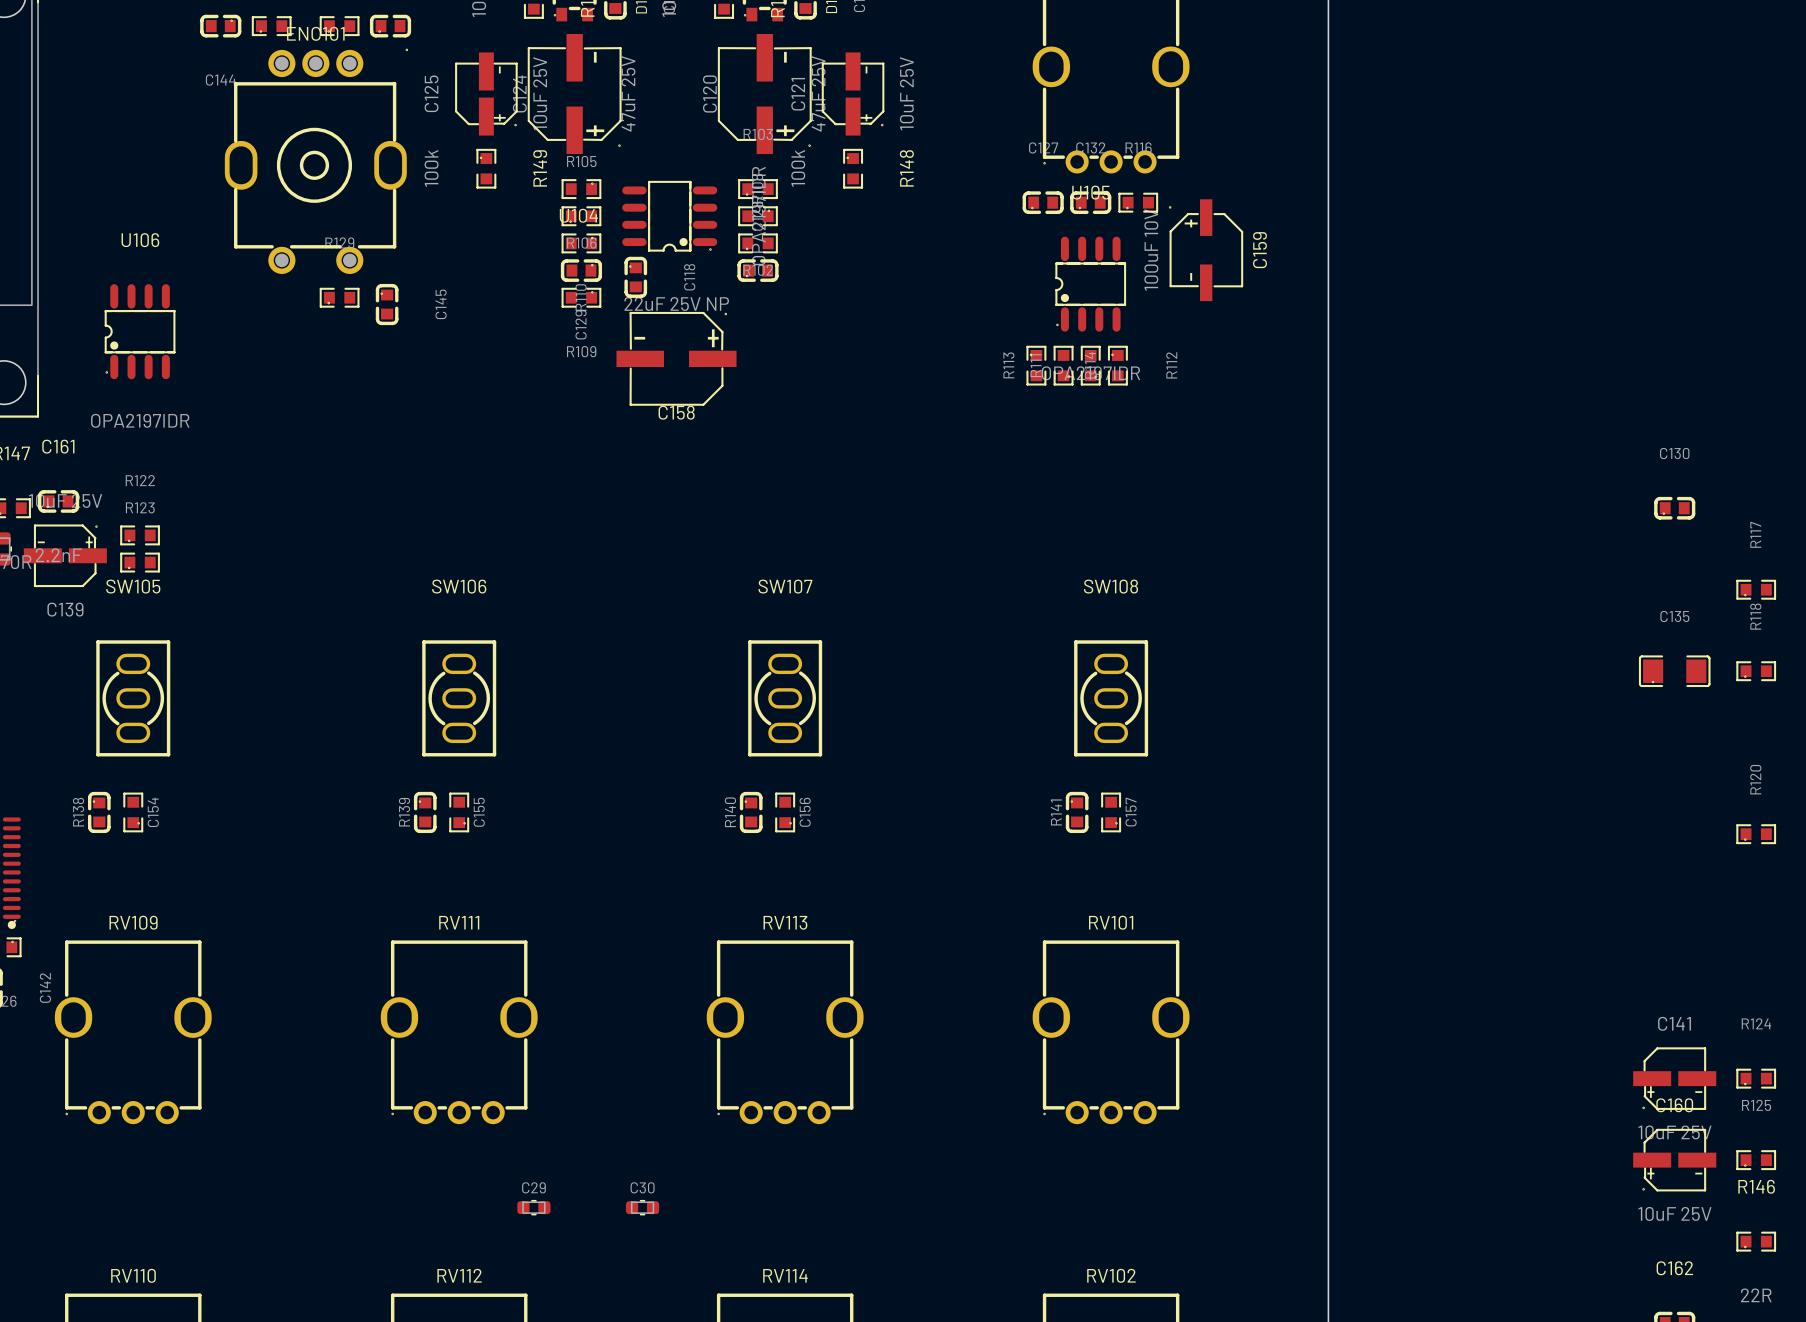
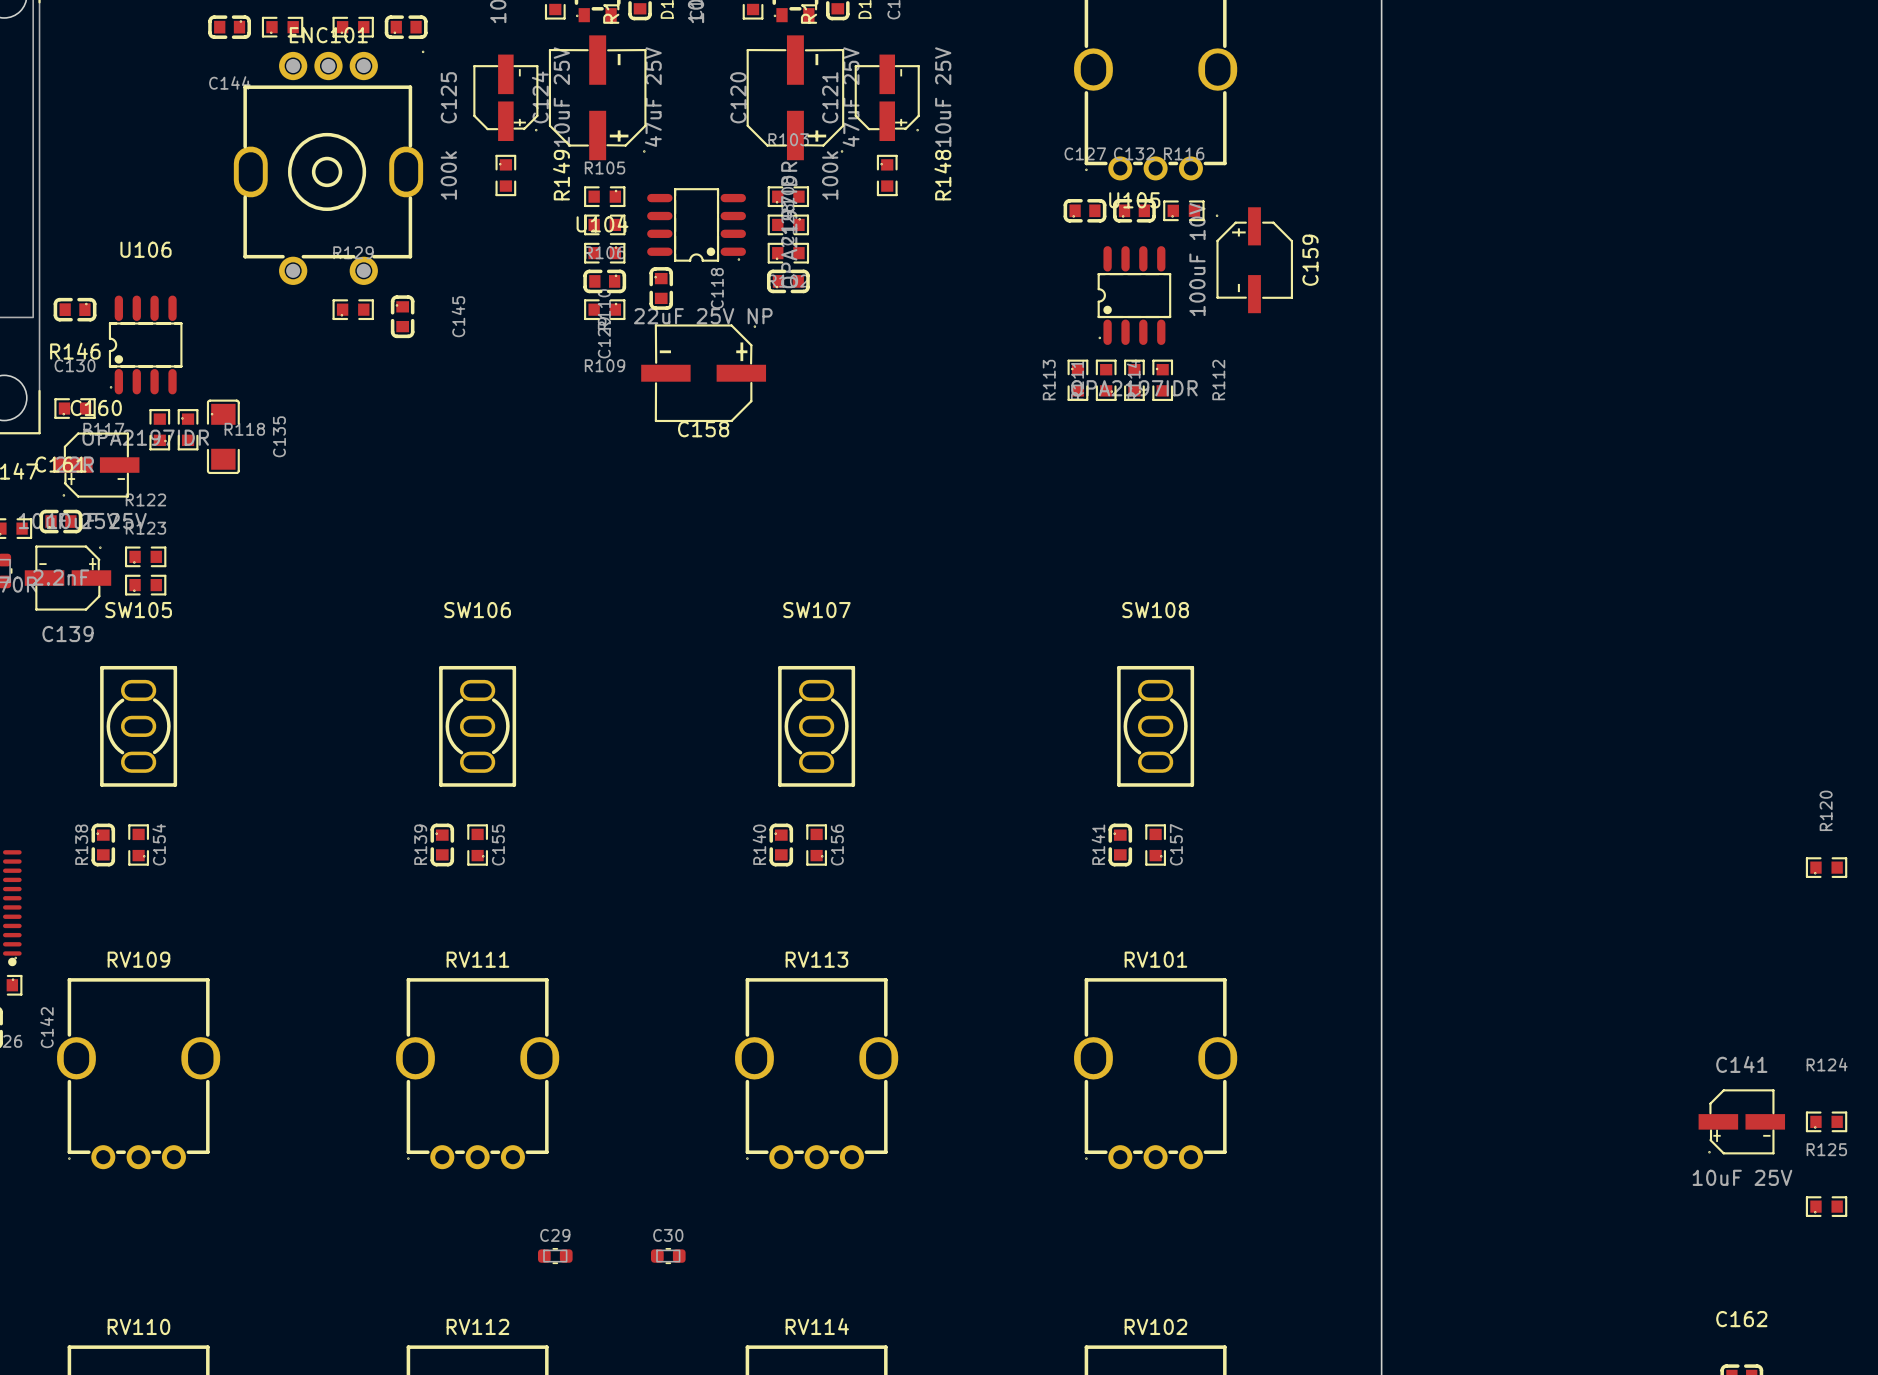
C130 rotation: 0° (1674, 508) -> 180° (75, 309)
C130 position: (1674, 508) -> (75, 309)
R117 rotation: 0° (1756, 589) -> 90° counterclockwise (159, 429)
R117 position: (1756, 589) -> (159, 429)
C135 rotation: 0° (1674, 671) -> 90° clockwise (223, 436)
C135 position: (1674, 671) -> (223, 436)
R118 rotation: 0° (1756, 671) -> 90° clockwise (188, 429)
R118 position: (1756, 671) -> (188, 429)
C160 position: (1674, 1160) -> (96, 465)
R146 position: (1756, 1241) -> (75, 408)

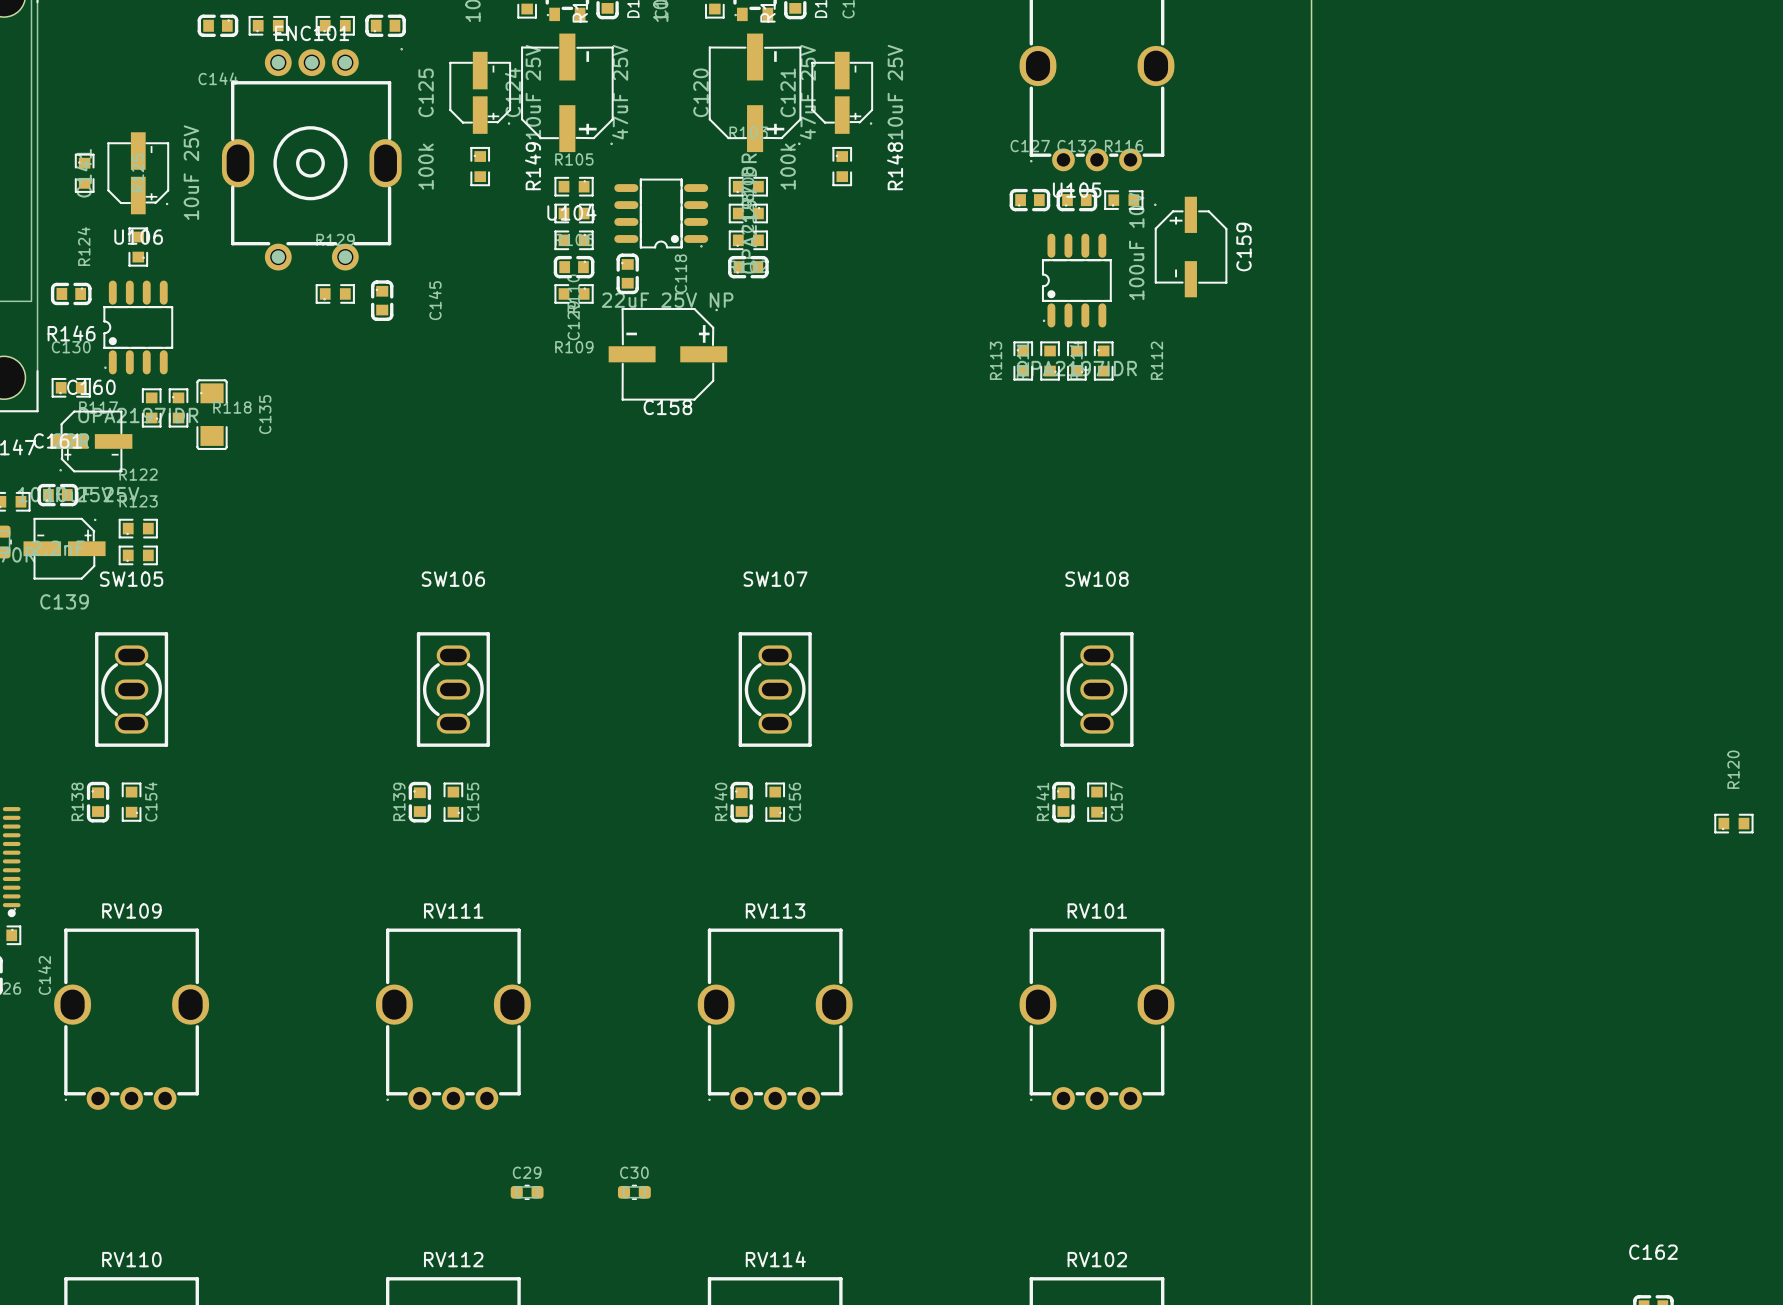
C141 rotation: 0° (1741, 1121) -> 90° counterclockwise (138, 173)
C141 position: (1741, 1121) -> (138, 173)
R124 rotation: 0° (1826, 1121) -> 90° counterclockwise (138, 247)
R124 position: (1826, 1121) -> (138, 247)
R125 rotation: 0° (1826, 1206) -> 90° clockwise (84, 173)
R125 position: (1826, 1206) -> (84, 173)

